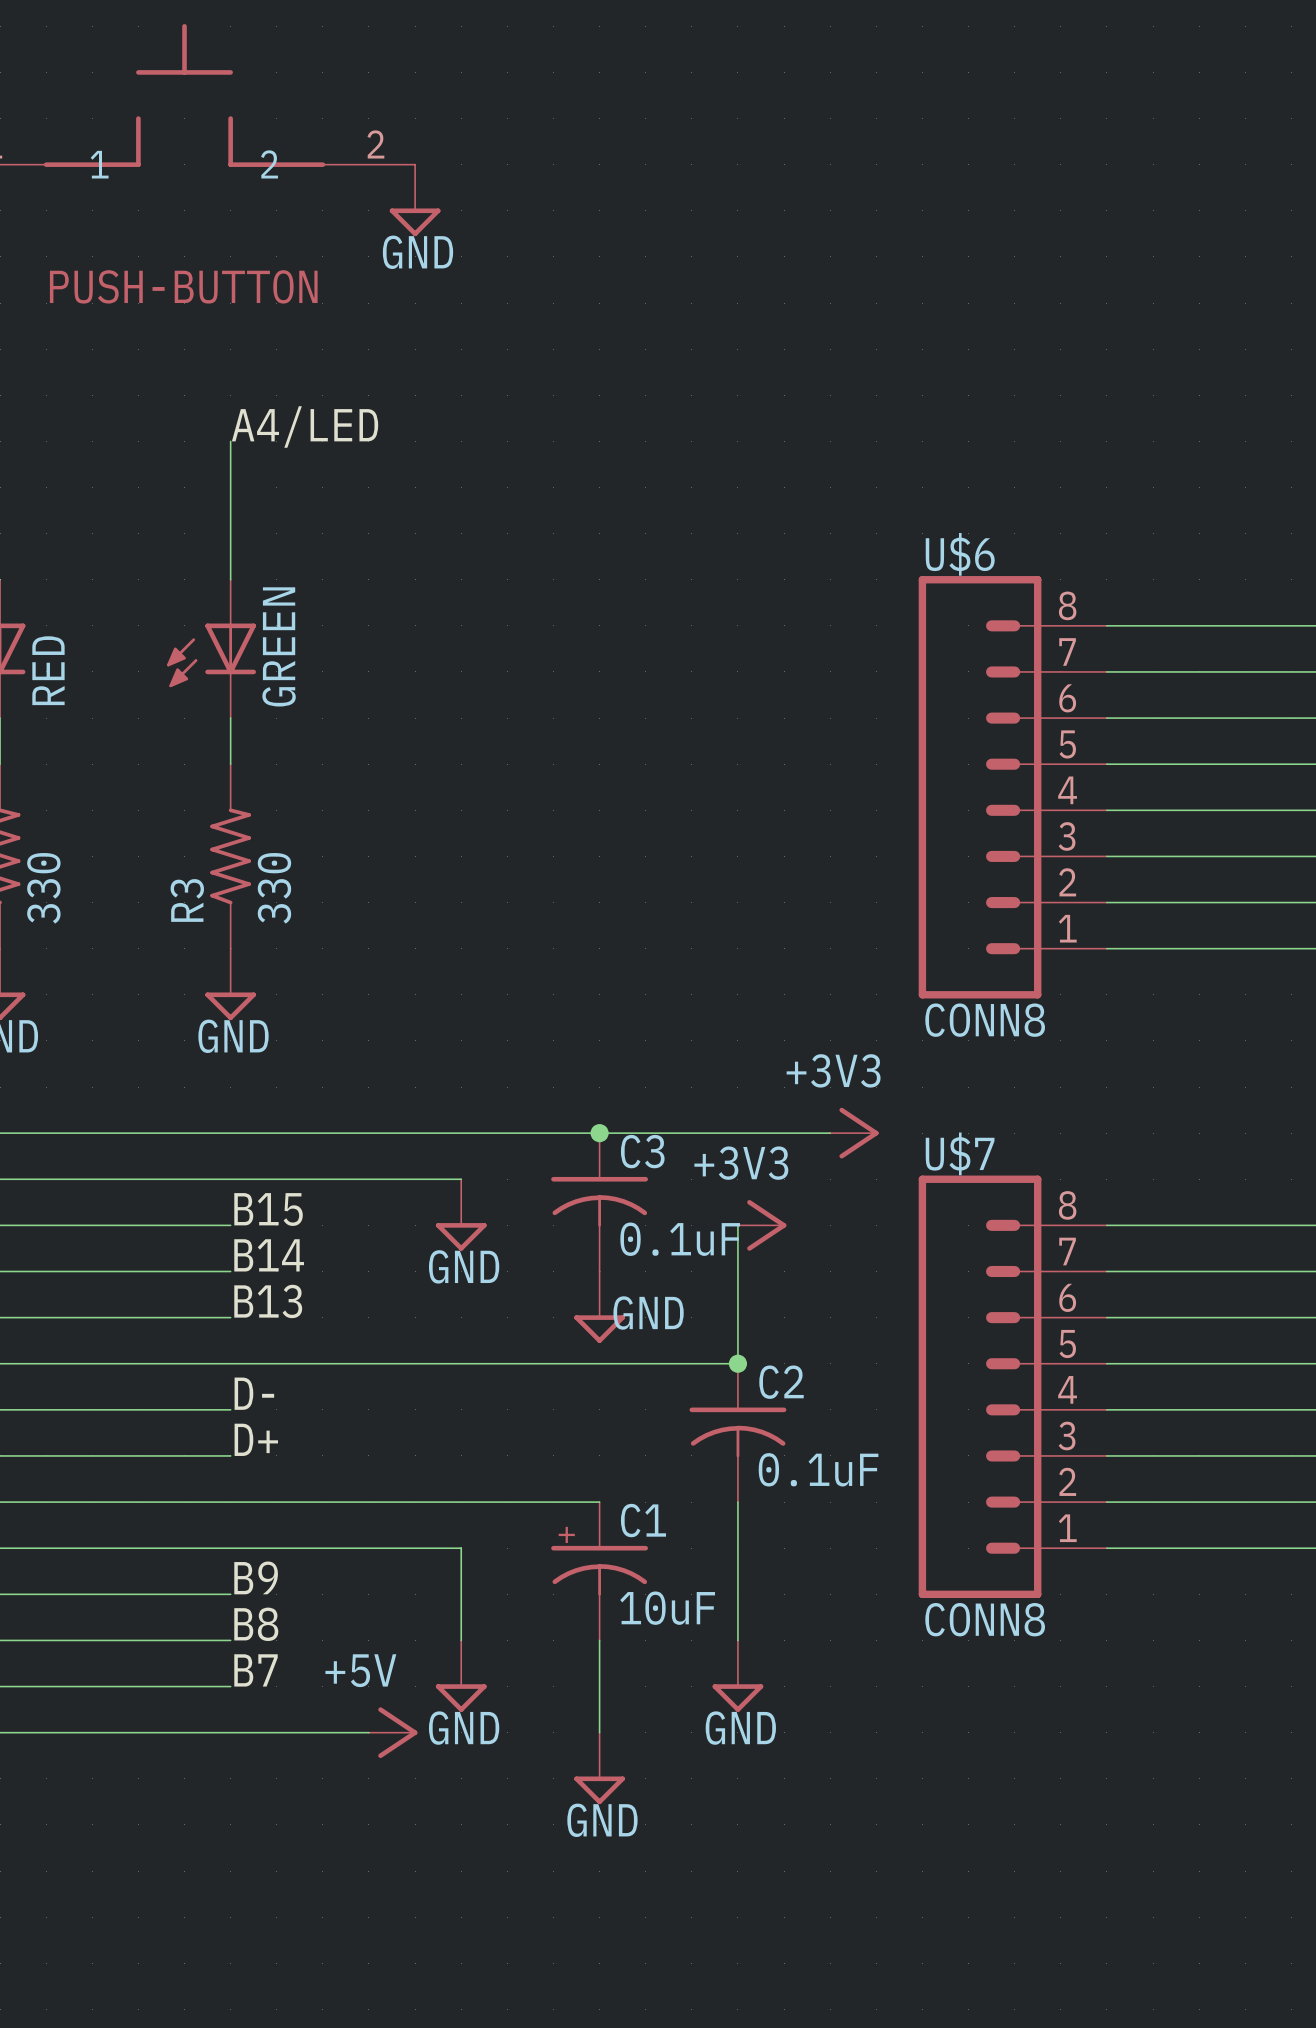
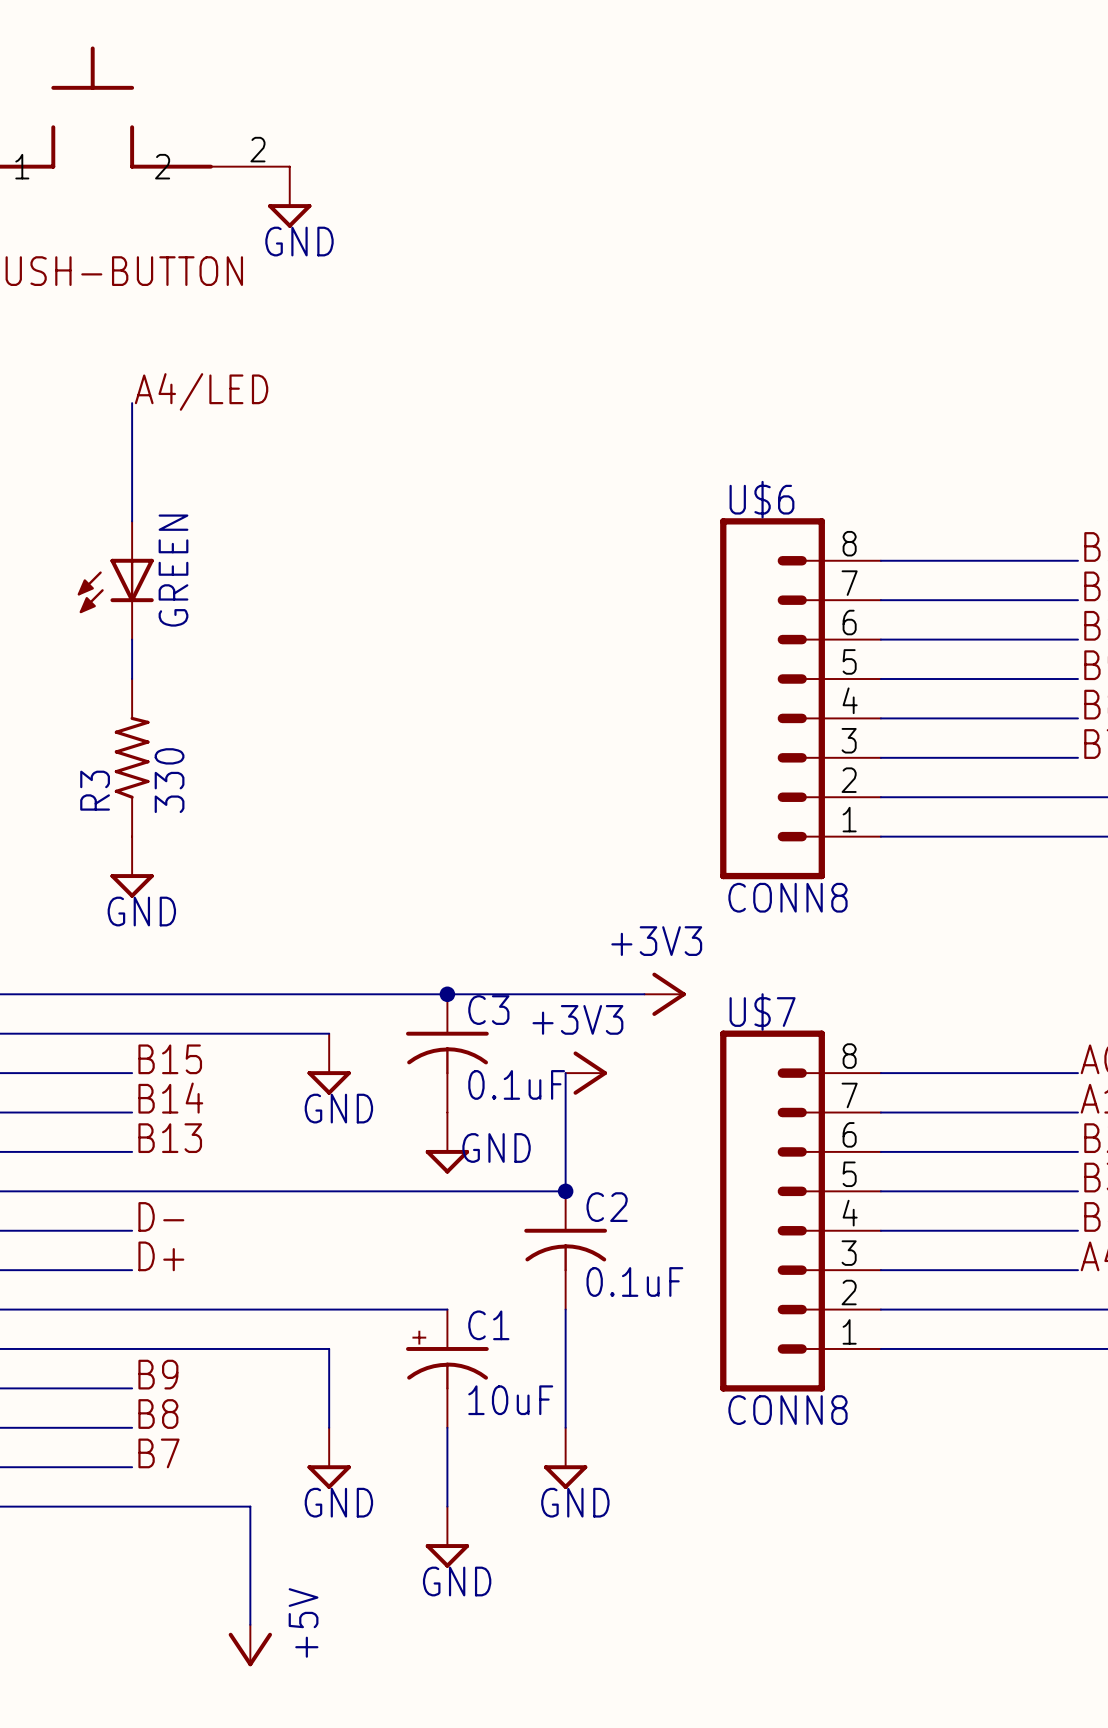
wire: none -> (250, 1506) (250, 1624)
power symbol position: +5V (393, 1732) -> +5V (250, 1645)
power symbol rotation: 0° (397, 1732) -> 90° clockwise (250, 1649)

